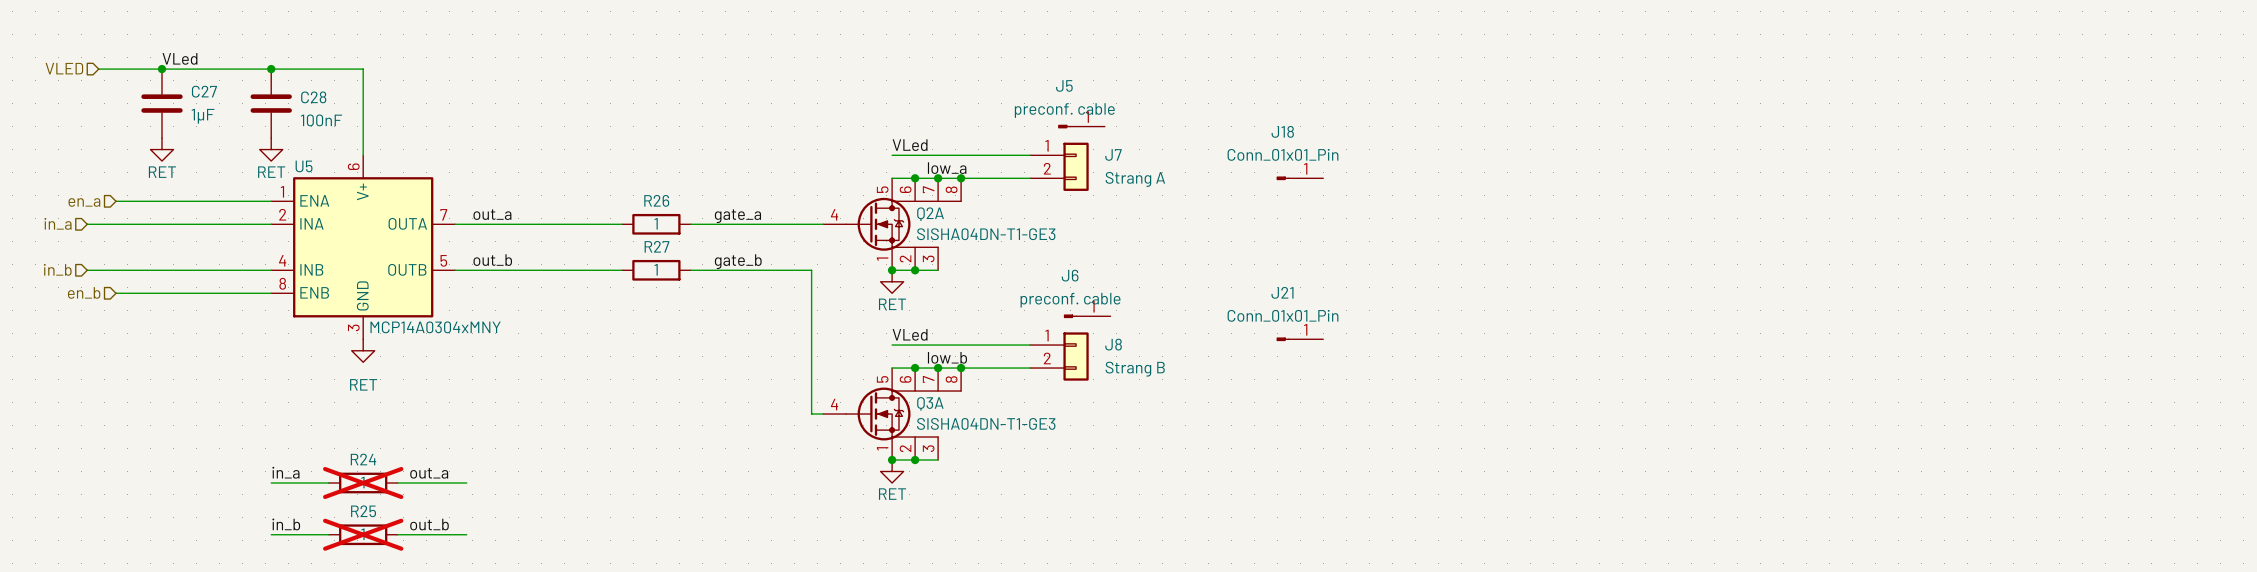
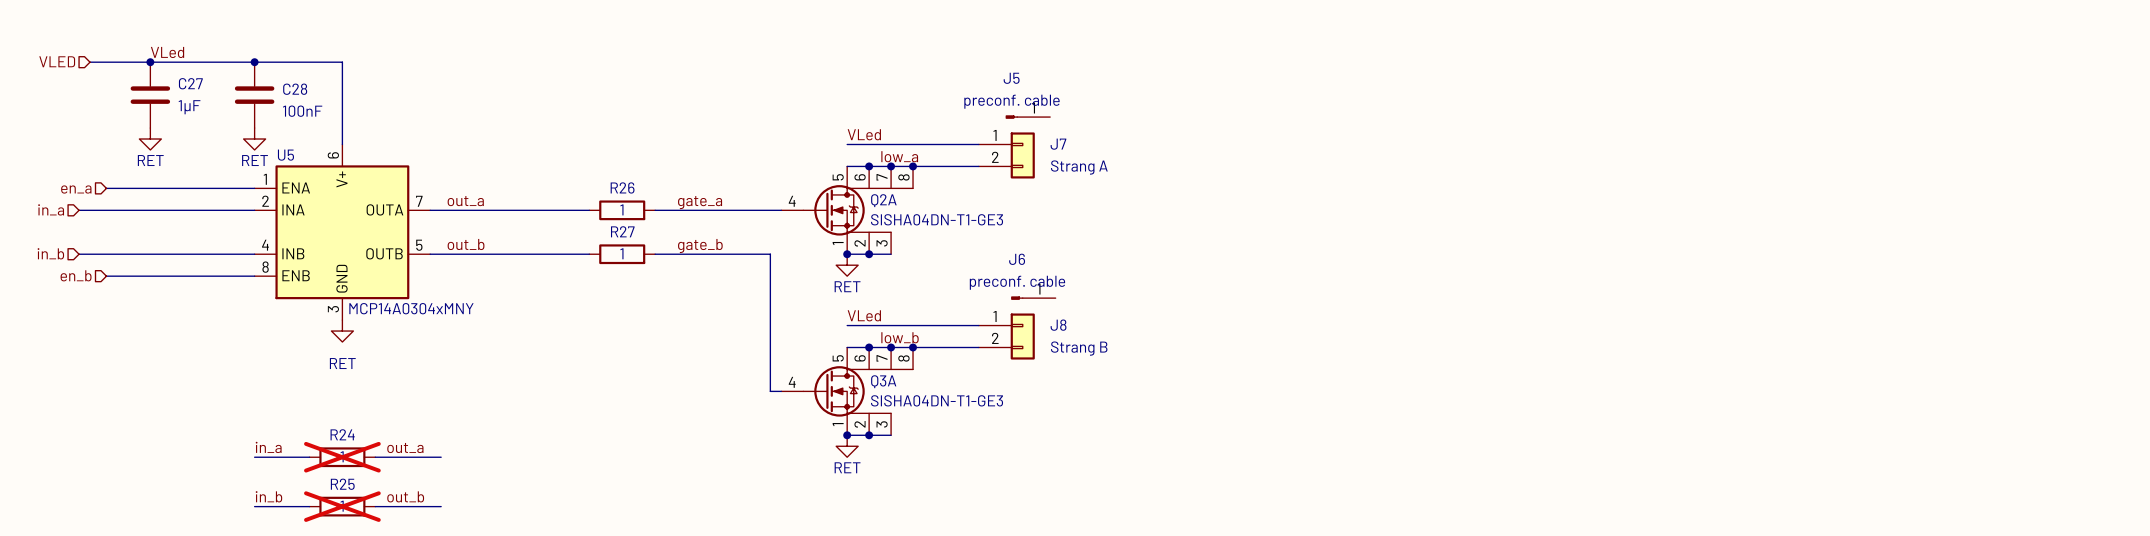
J18: Conn_01x01_Pin (1299, 178) -> none
J21: Conn_01x01_Pin (1299, 339) -> none

